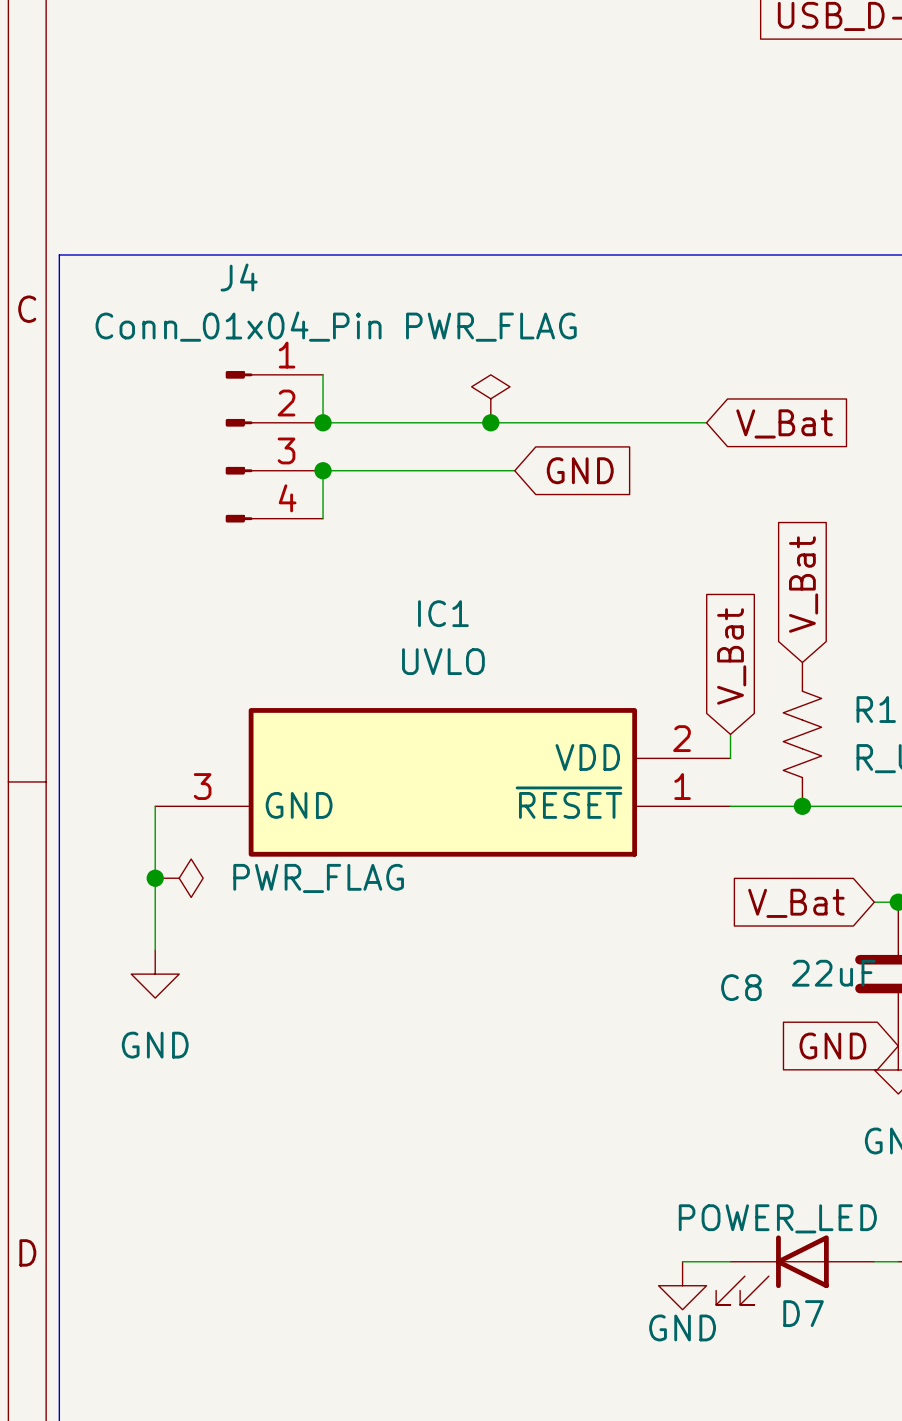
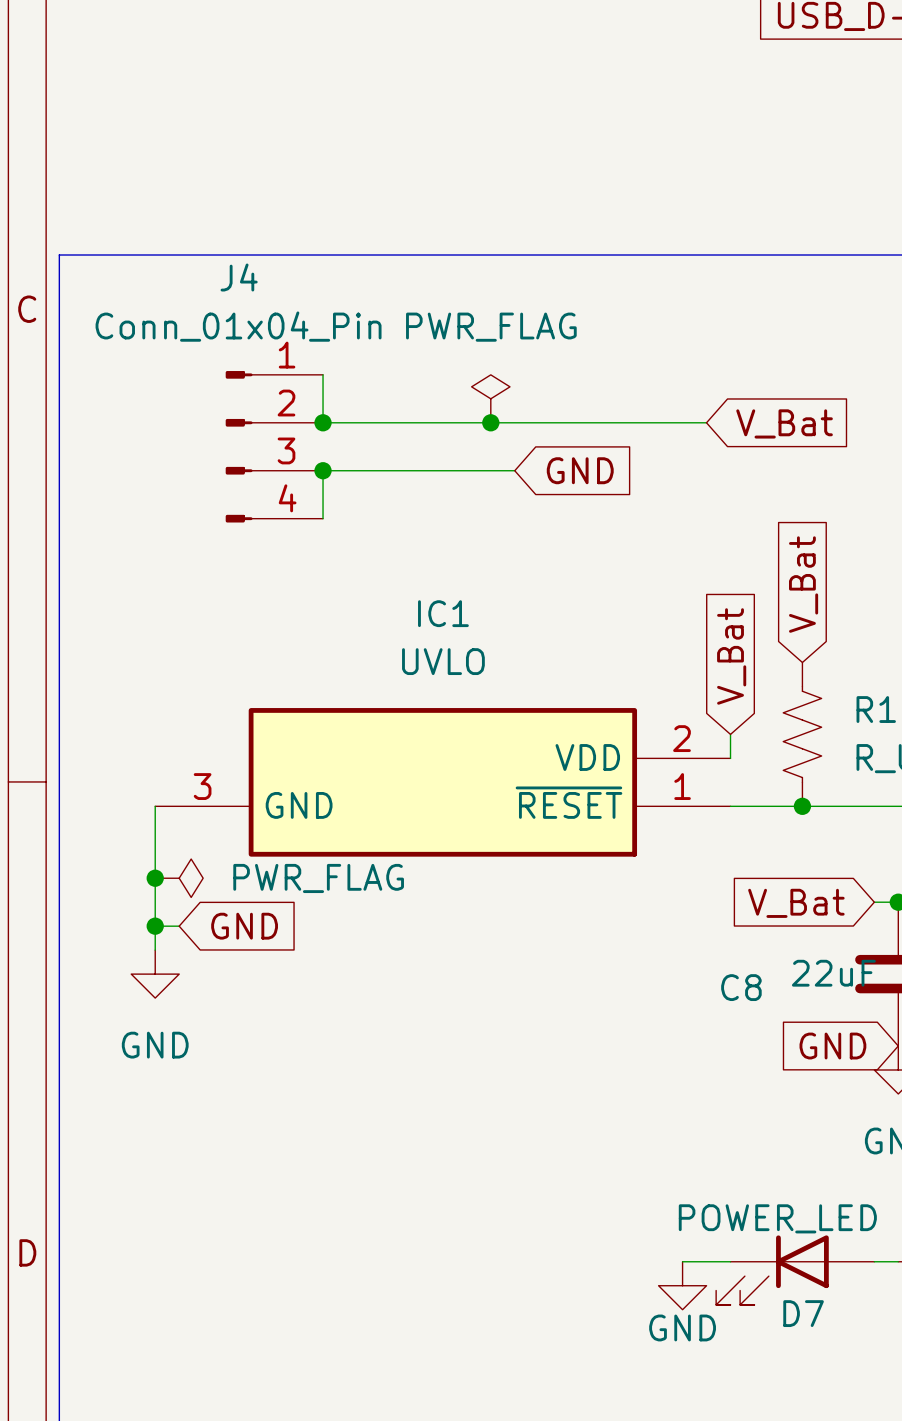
wire: none -> (155, 926) (179, 926)
junction: none -> (155, 926)
global label: none -> GND (244, 926)

